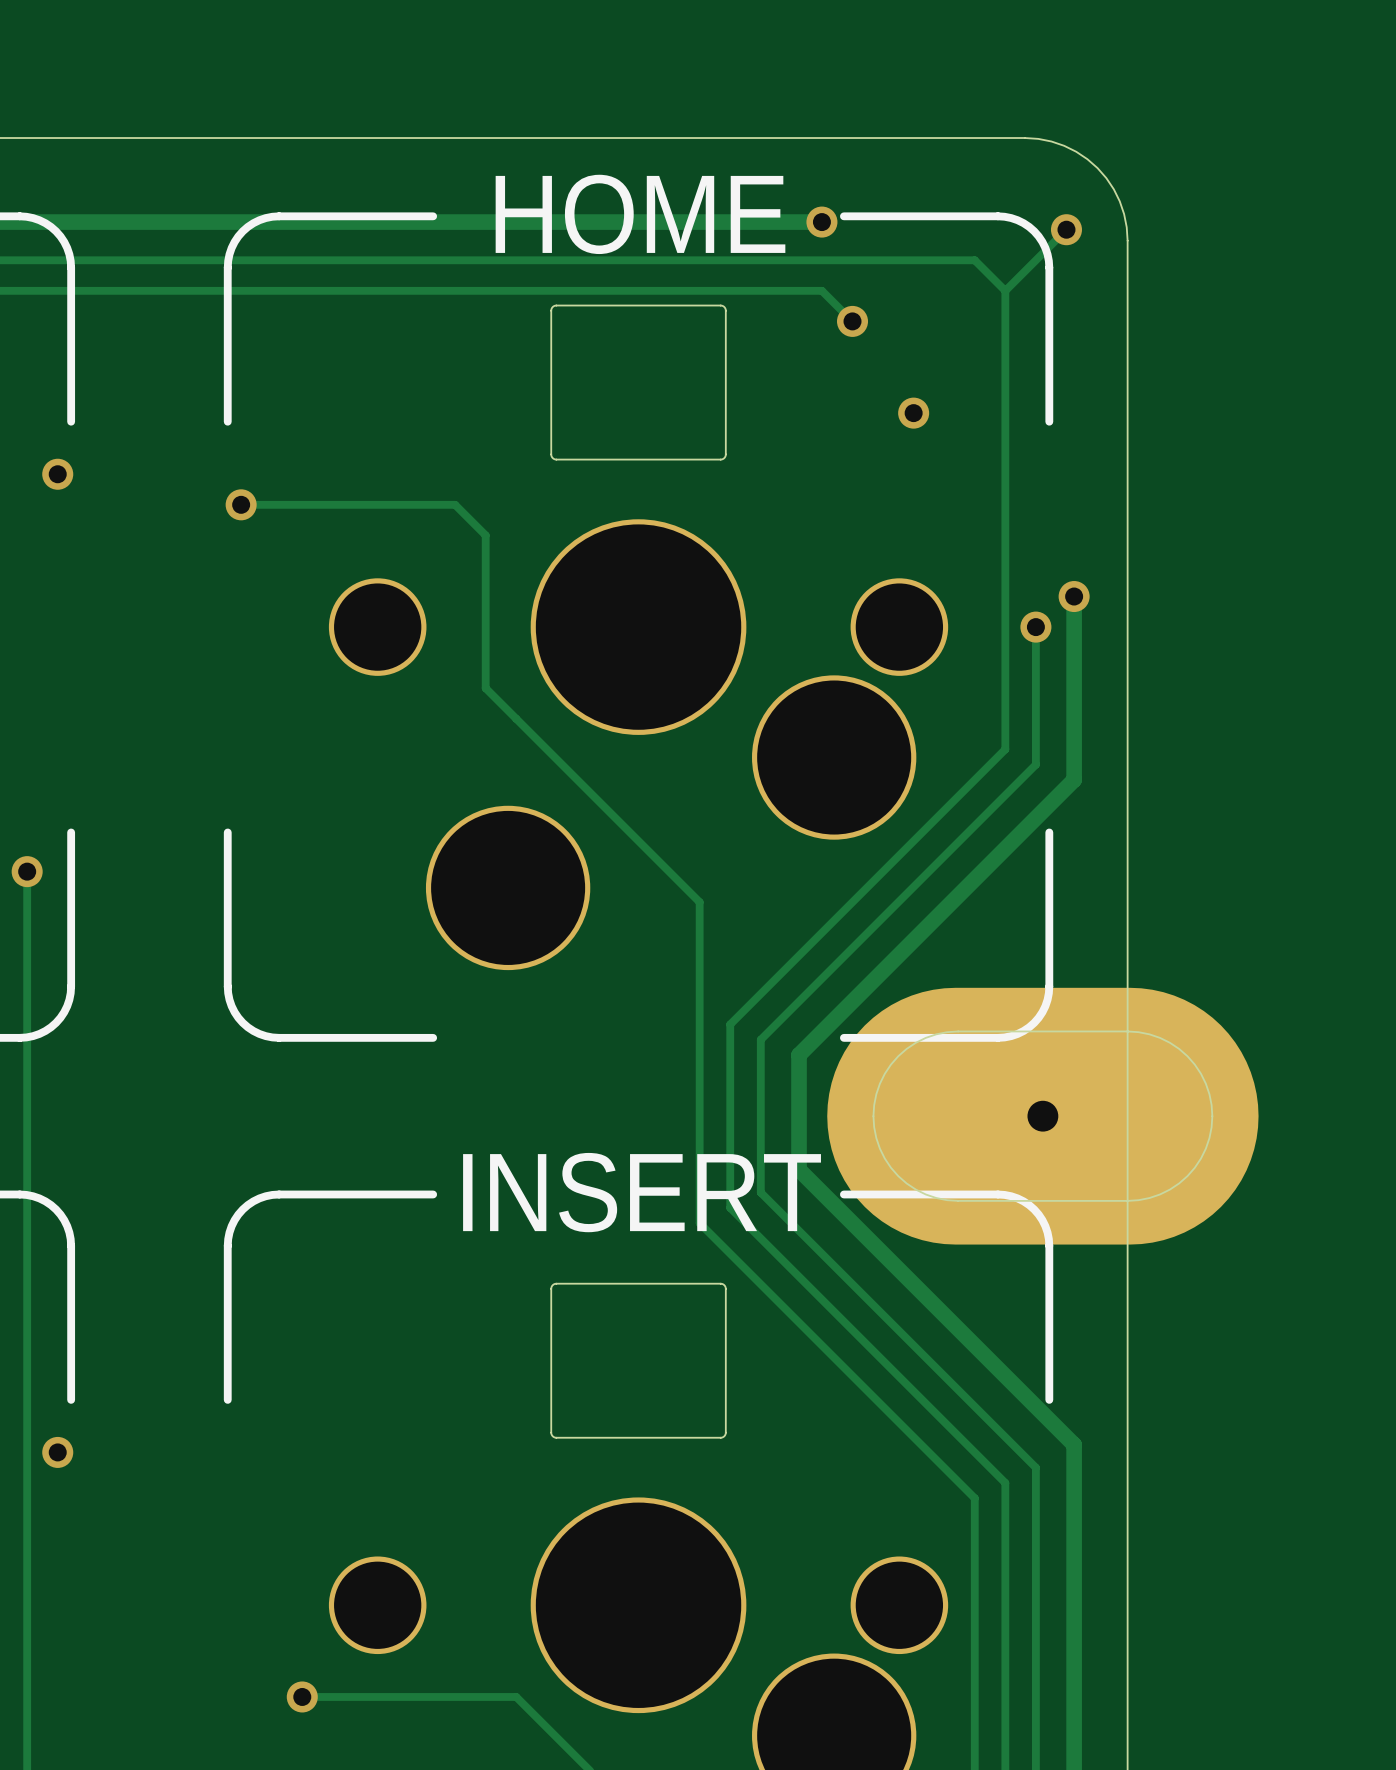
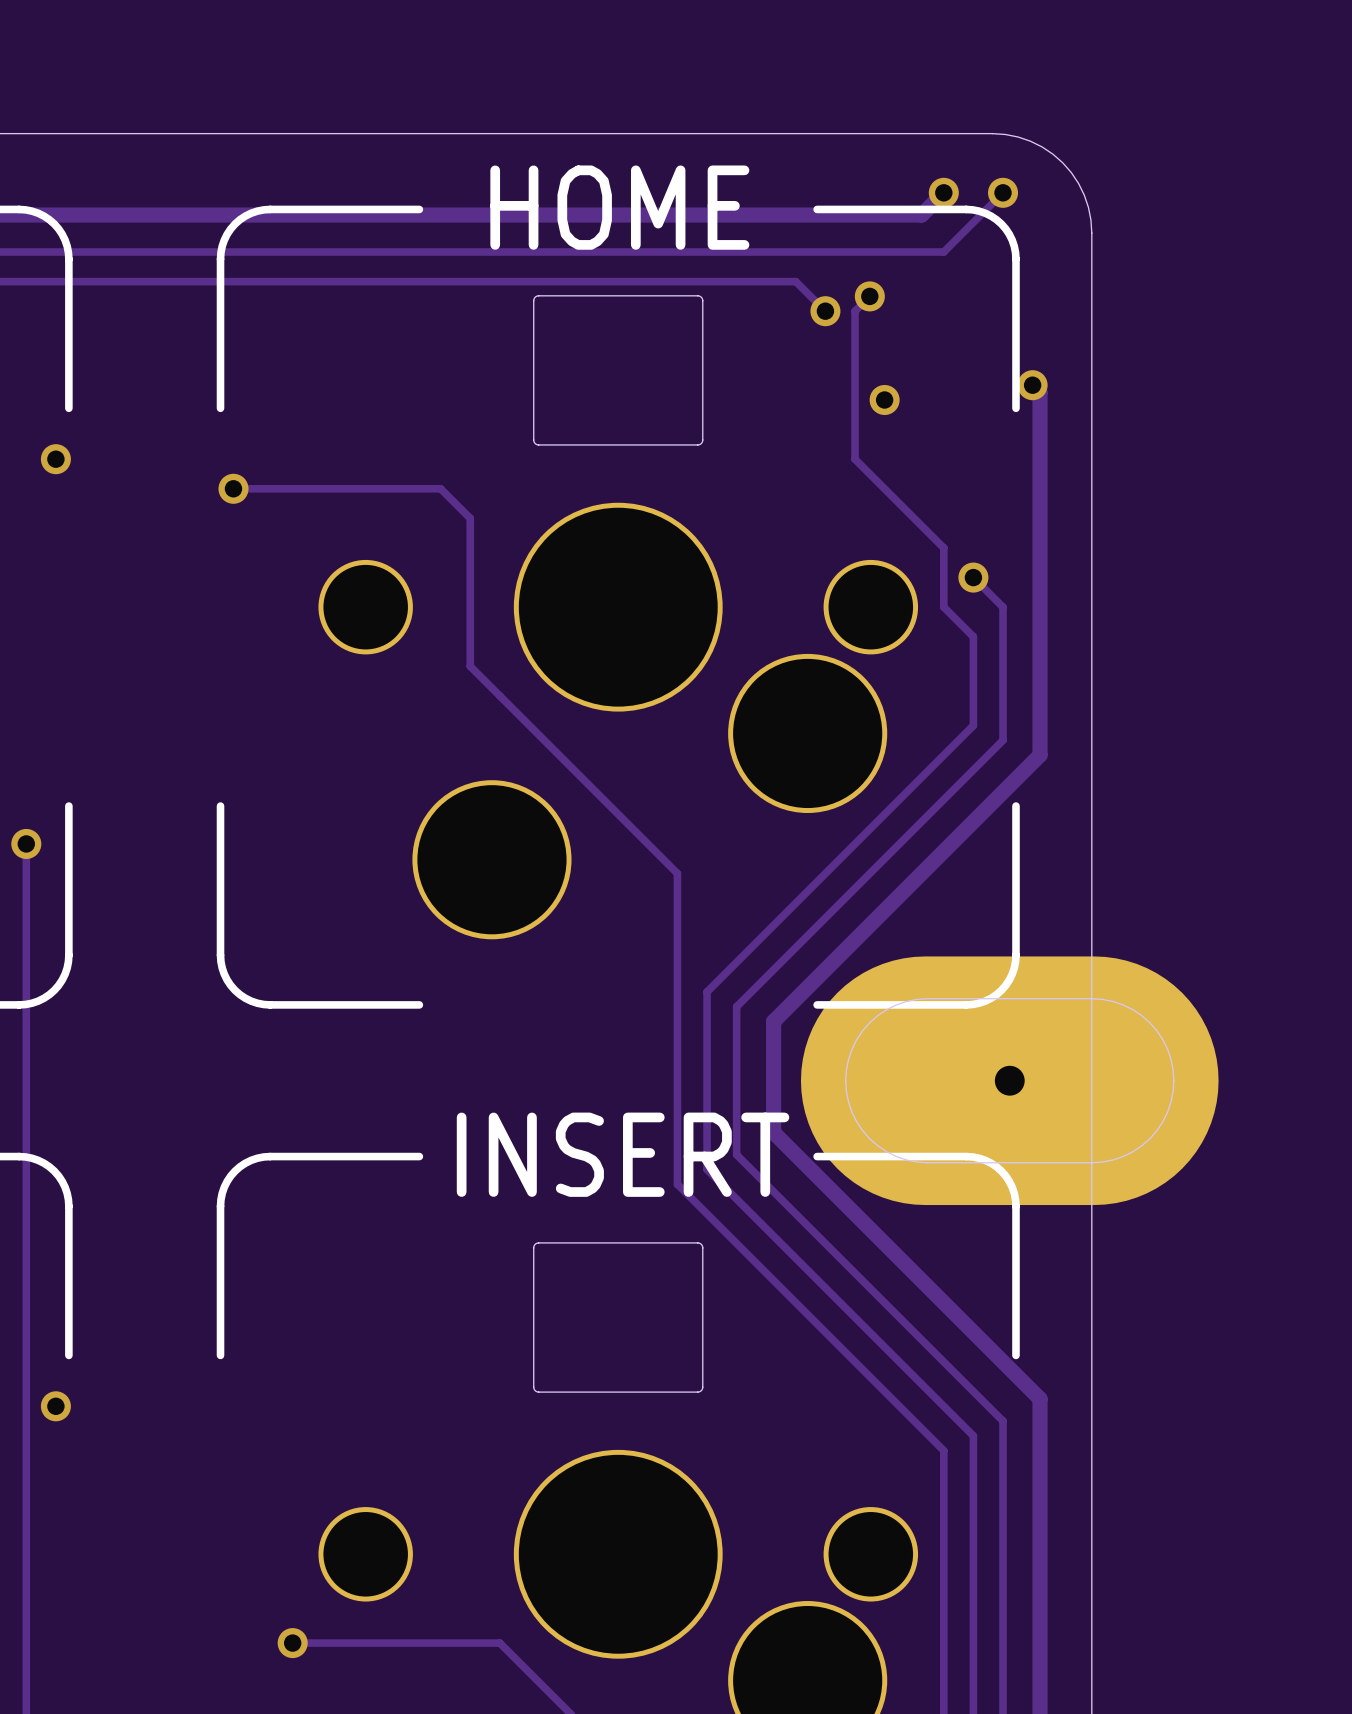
track: none -> (943, 192) (921, 215) (795, 215)
via: none -> (943, 192)
via: (821, 222) -> none
track: (1066, 229) (1005, 290) -> none
via position: (1066, 229) -> (1003, 192)
track: (974, 260) (1005, 290) -> (943, 252) (1003, 192)
track: (1005, 290) (1005, 657) -> (869, 296) (855, 311) (855, 459) (943, 547) (943, 607) (973, 636)
via: none -> (869, 296)
track: none -> (1032, 385) (1040, 392) (1040, 577)
via: none -> (1032, 385)
track: none -> (973, 577) (1003, 607)
via: (1074, 596) -> none
via position: (1035, 627) -> (973, 577)

